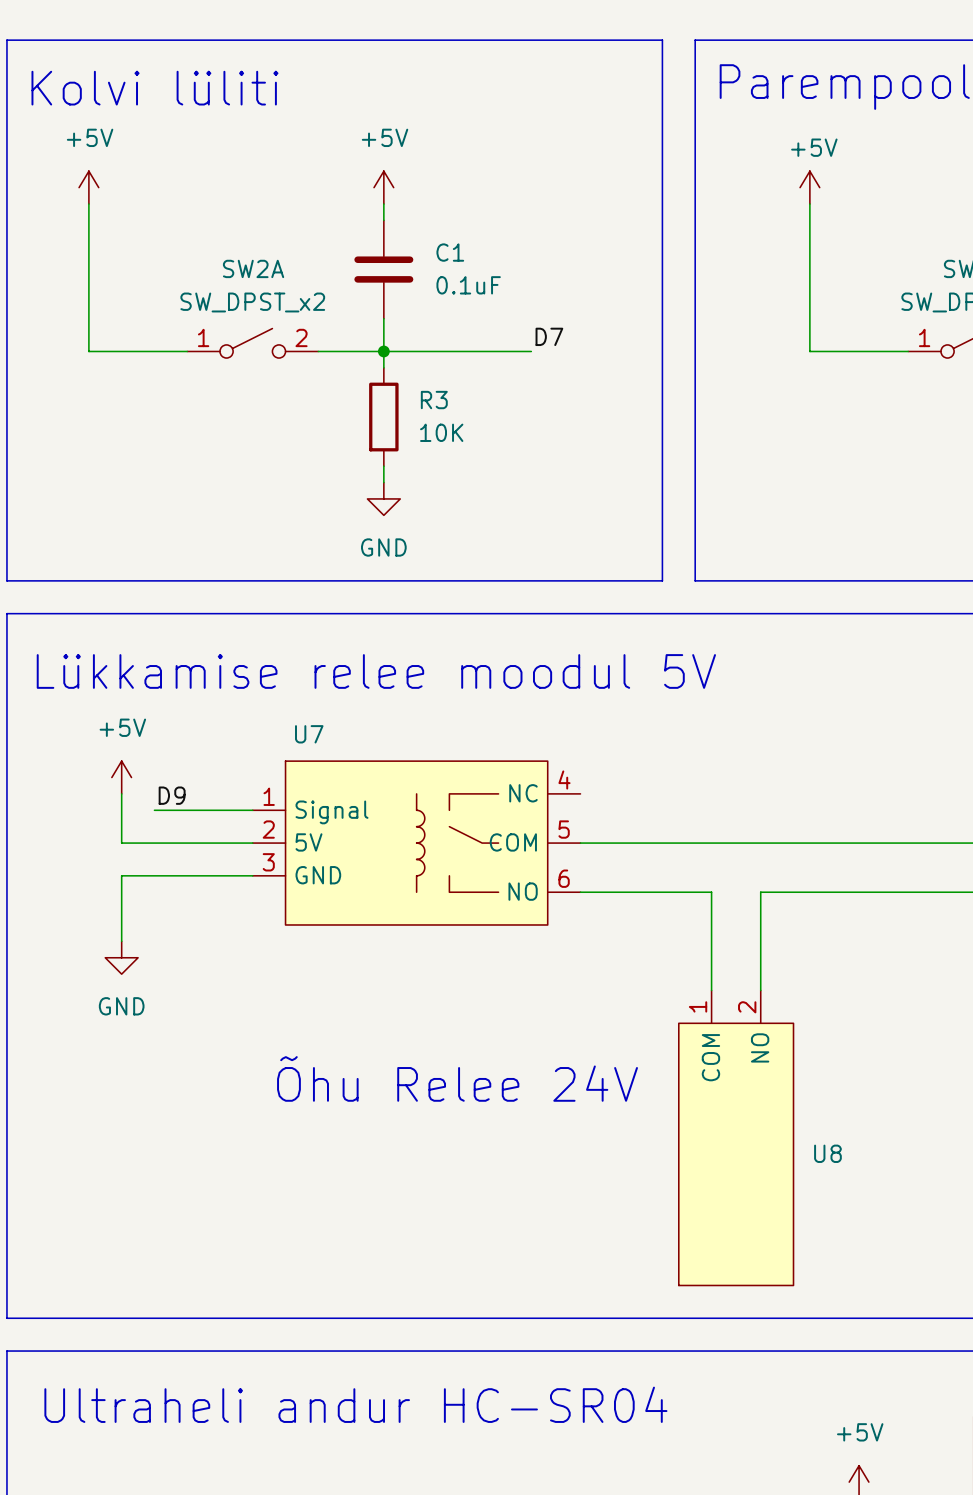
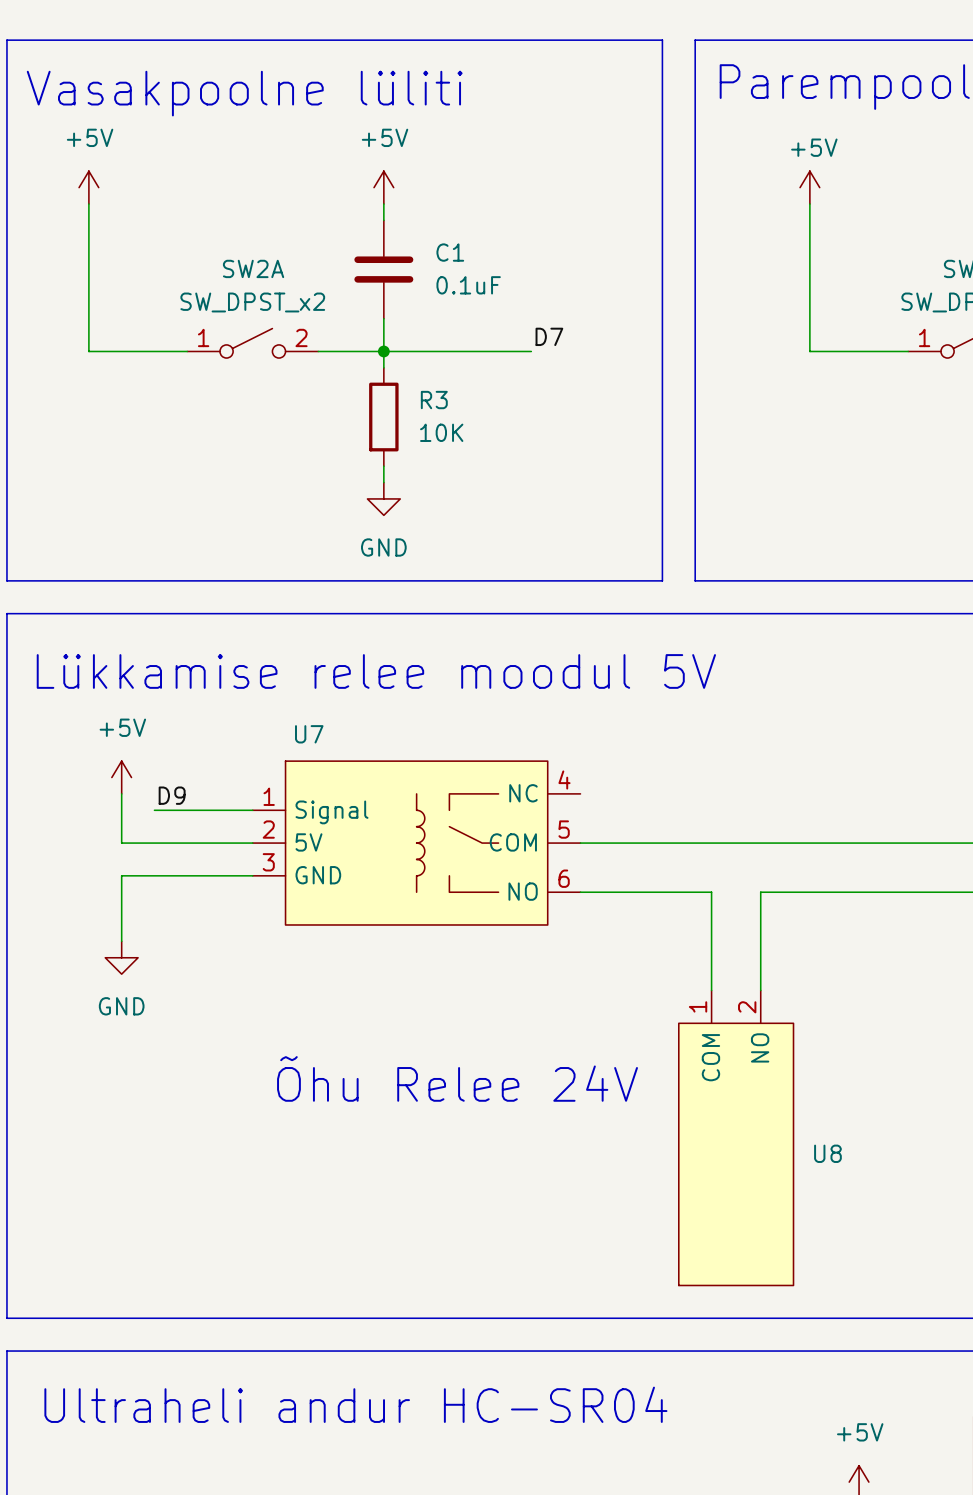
text: Kolvi lüliti (154, 88) -> Vasakpoolne lüliti (244, 93)

